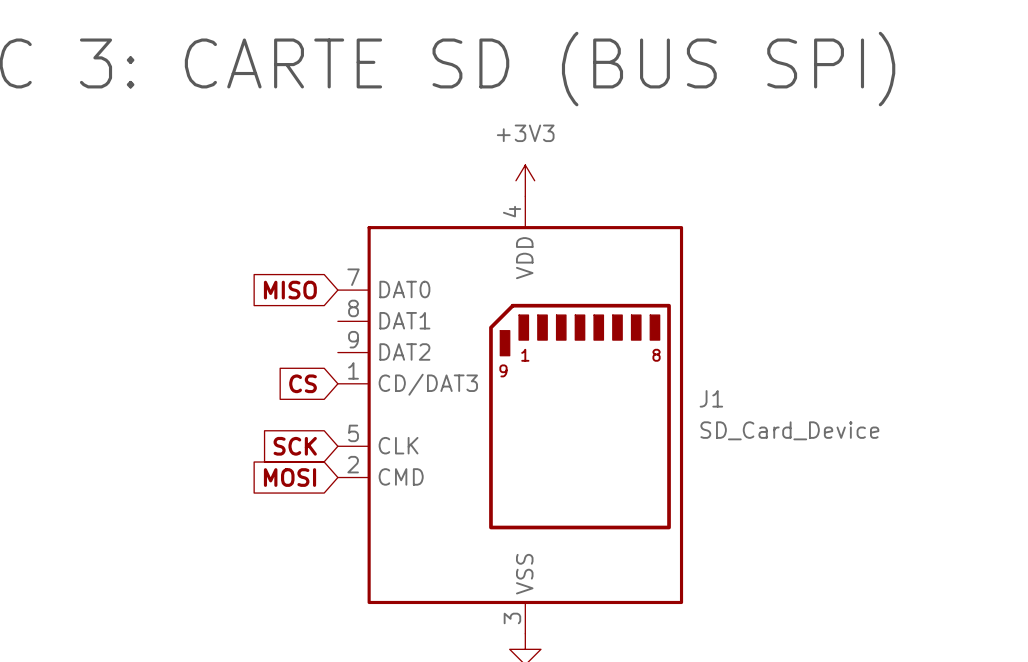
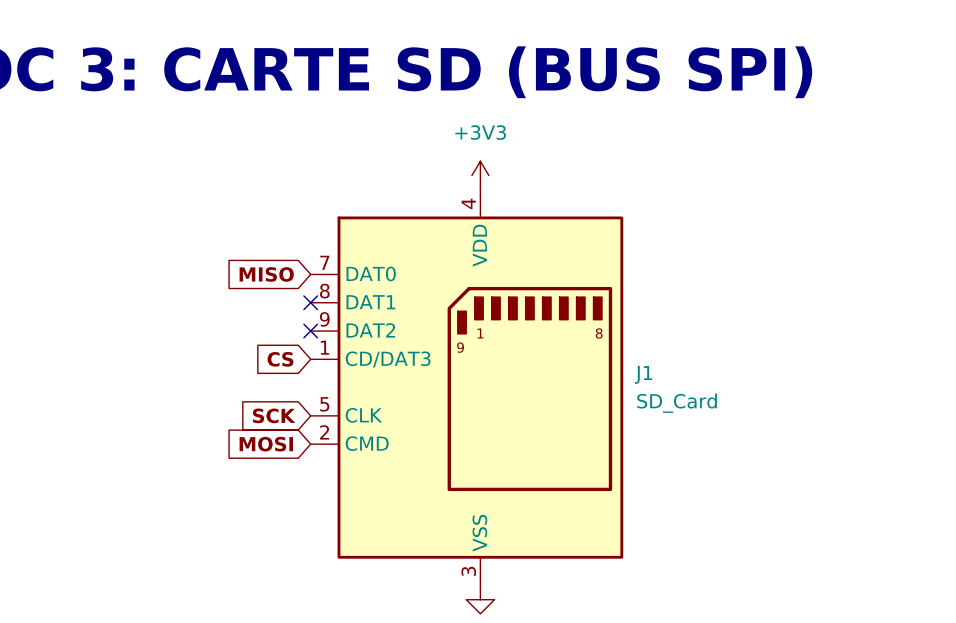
no-connect mark: none -> (310, 302)
no-connect mark: none -> (310, 331)
J1 value: SD_Card_Device (789, 430) -> SD_Card (677, 403)

